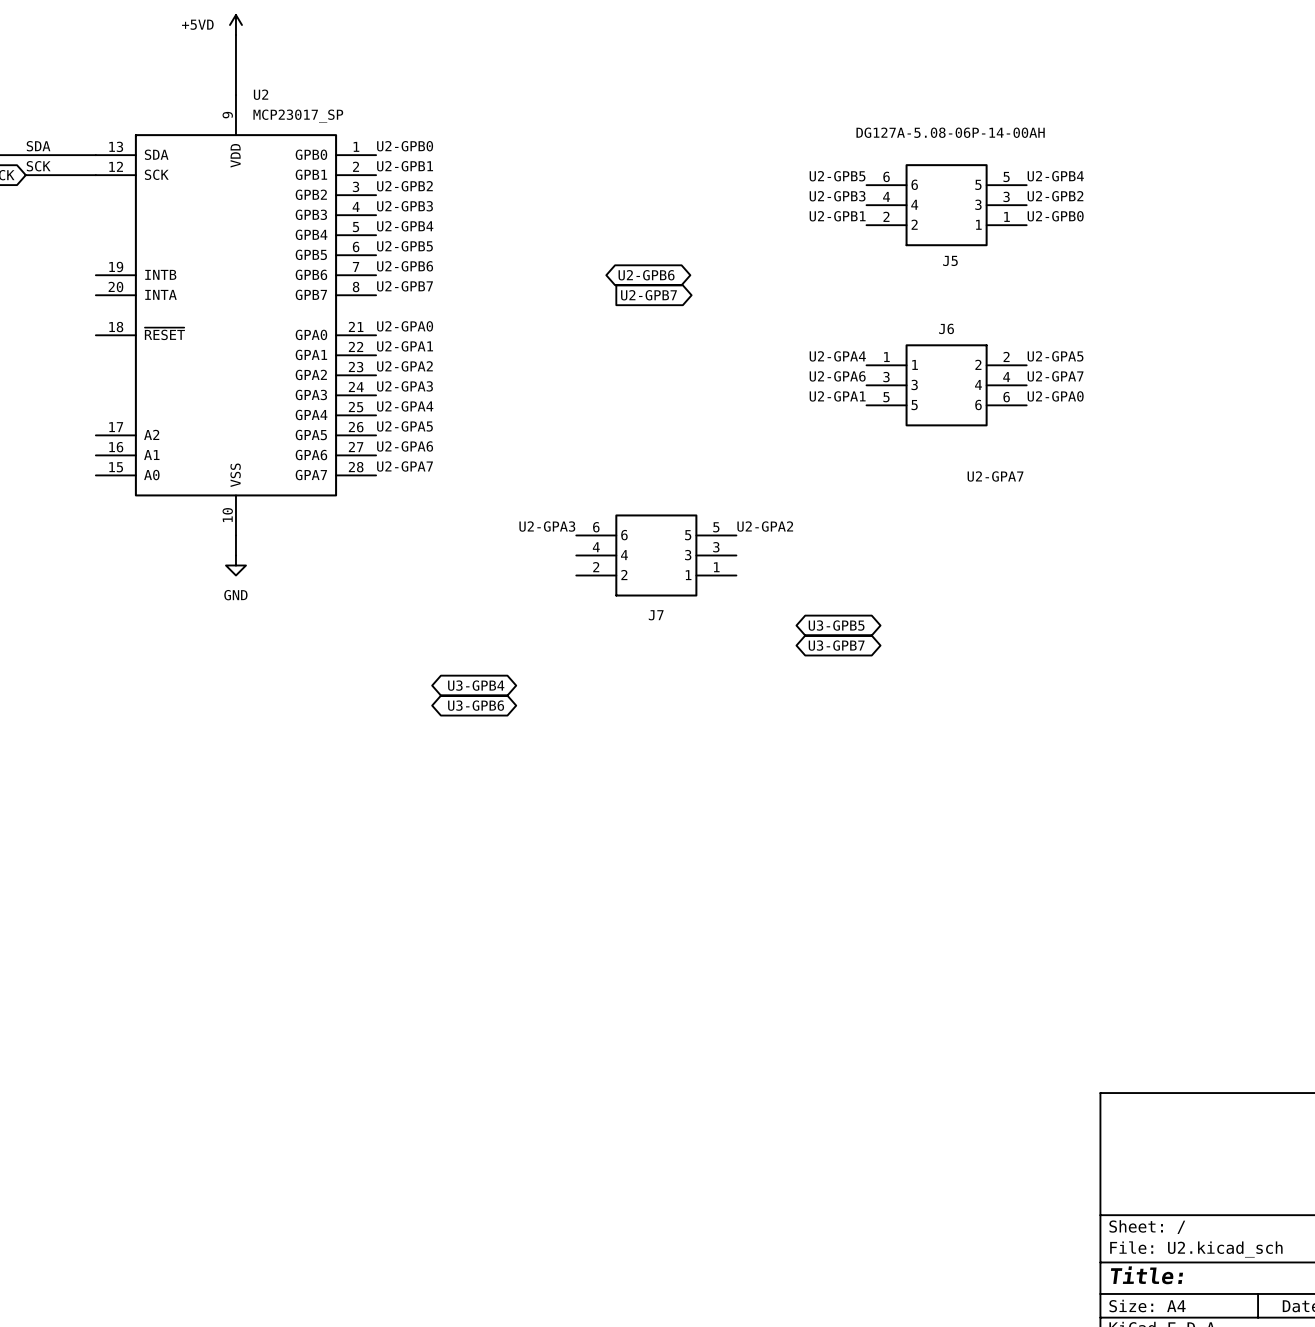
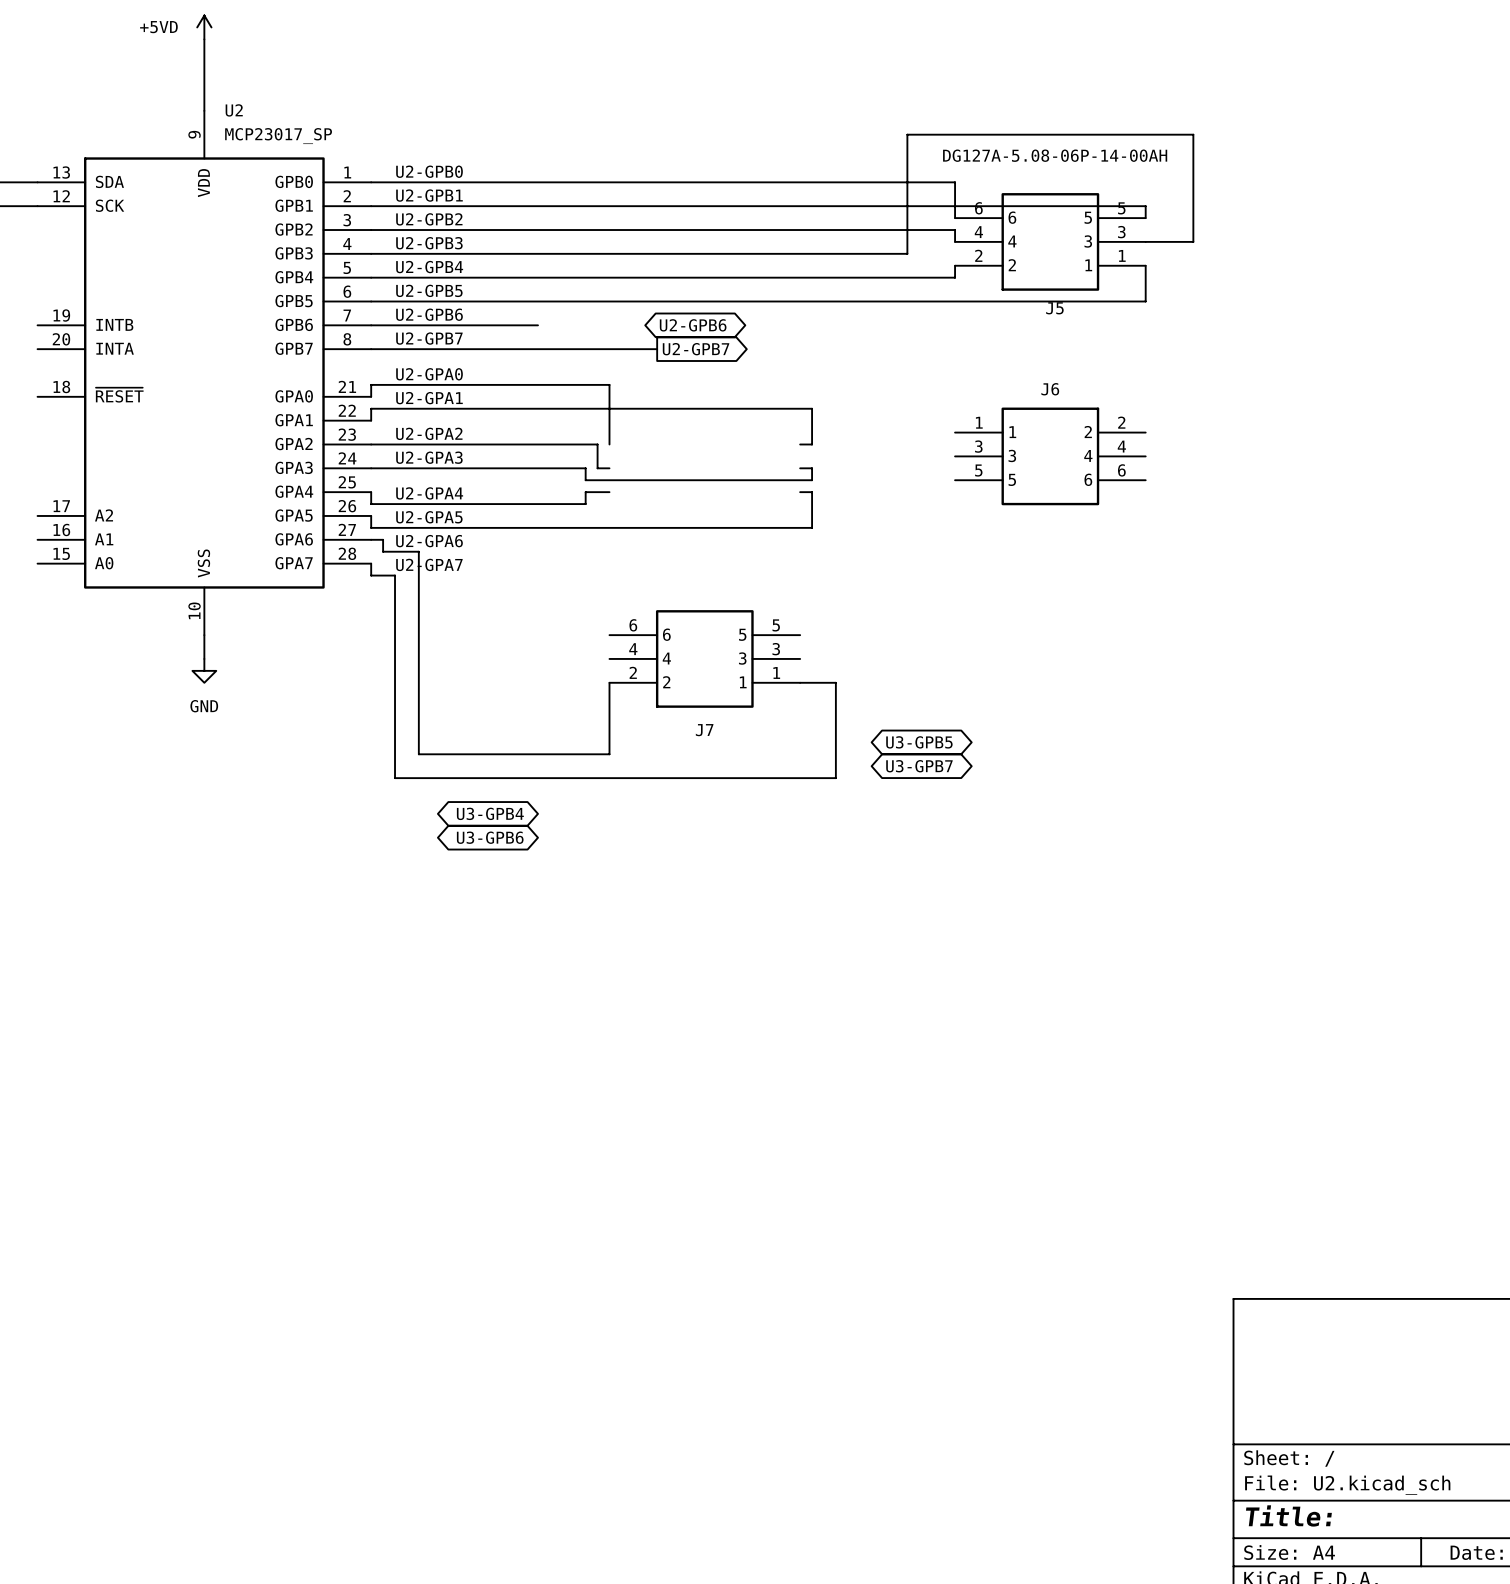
label position: U2-GPB0 (405, 146) -> U2-GPB0 (429, 171)
wire: none -> (371, 182) (955, 182) (955, 218)
label position: U2-GPB1 (405, 166) -> U2-GPB1 (429, 195)
wire: none -> (371, 206) (1145, 206) (1145, 218)
label: U2-GPB5 (837, 176) -> none
label: U2-GPB4 (1055, 176) -> none
label position: U2-GPB2 (404, 186) -> U2-GPB2 (429, 219)
wire: none -> (371, 230) (955, 230) (955, 241)
label: U2-GPB3 (837, 196) -> none
label: U2-GPB2 (1055, 196) -> none
wire: none -> (1145, 241) (1193, 241) (1193, 134) (907, 134) (907, 253) (371, 253)
label position: U2-GPB3 (405, 206) -> U2-GPB3 (429, 243)
label: U2-GPB1 (837, 216) -> none
label: U2-GPB0 (1055, 216) -> none
wire: none -> (955, 265) (955, 277) (371, 277)
wire: none -> (1145, 265) (1145, 301) (371, 301)
label position: U2-GPB4 (405, 226) -> U2-GPB4 (429, 267)
label position: U2-GPB5 (404, 246) -> U2-GPB5 (429, 290)
label position: U2-GPB6 (405, 266) -> U2-GPB6 (429, 314)
wire: none -> (371, 325) (538, 325)
label position: U2-GPB7 (405, 286) -> U2-GPB7 (429, 338)
wire: none -> (371, 349) (657, 349)
label position: U2-GPA0 (405, 326) -> U2-GPA0 (429, 374)
wire: none -> (371, 396) (371, 384) (609, 384) (609, 444)
label position: U2-GPA1 (405, 346) -> U2-GPA1 (429, 398)
wire: none -> (371, 420) (371, 408) (812, 408) (812, 444) (800, 444)
label: U2-GPA4 (837, 356) -> none
label: U2-GPA5 (1055, 356) -> none
label position: U2-GPA2 (404, 366) -> U2-GPA2 (429, 433)
wire: none -> (371, 444) (597, 444) (597, 468) (609, 468)
label: U2-GPA6 (837, 376) -> none
label: U2-GPA7 (1055, 376) -> none
label position: U2-GPA3 (405, 386) -> U2-GPA3 (429, 457)
wire: none -> (371, 468) (585, 468) (585, 480) (812, 480) (812, 468) (800, 468)
label: U2-GPA1 (837, 396) -> none
label: U2-GPA0 (1055, 396) -> none
label position: U2-GPA4 (405, 406) -> U2-GPA4 (429, 493)
wire: none -> (371, 492) (371, 504) (585, 504) (585, 492) (609, 492)
wire: none -> (800, 492) (812, 492) (812, 527) (371, 527) (371, 515)
label position: U2-GPA5 (404, 426) -> U2-GPA5 (429, 517)
label position: U2-GPA6 (405, 446) -> U2-GPA6 (429, 541)
wire: none -> (371, 539) (383, 539) (383, 551) (418, 551) (418, 754) (609, 754) (609, 682)
label position: U2-GPA7 (405, 466) -> U2-GPA7 (429, 564)
wire: none -> (371, 563) (371, 575) (395, 575) (395, 778) (835, 778) (835, 682) (800, 682)
label: U2-GPA7 (995, 476) -> none
label: U2-GPA3 (547, 526) -> none
label: U2-GPA2 (765, 526) -> none

